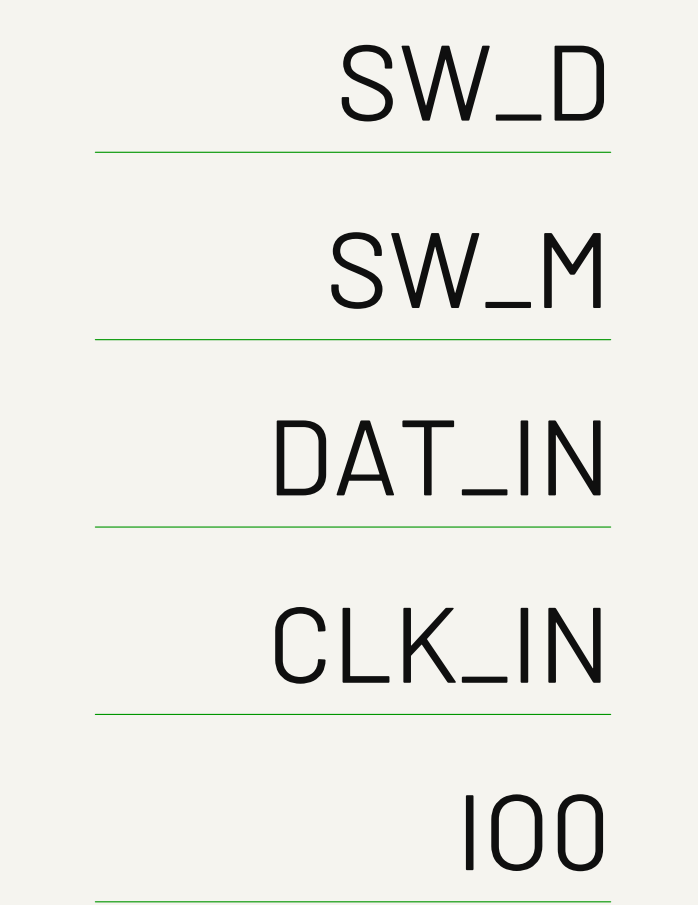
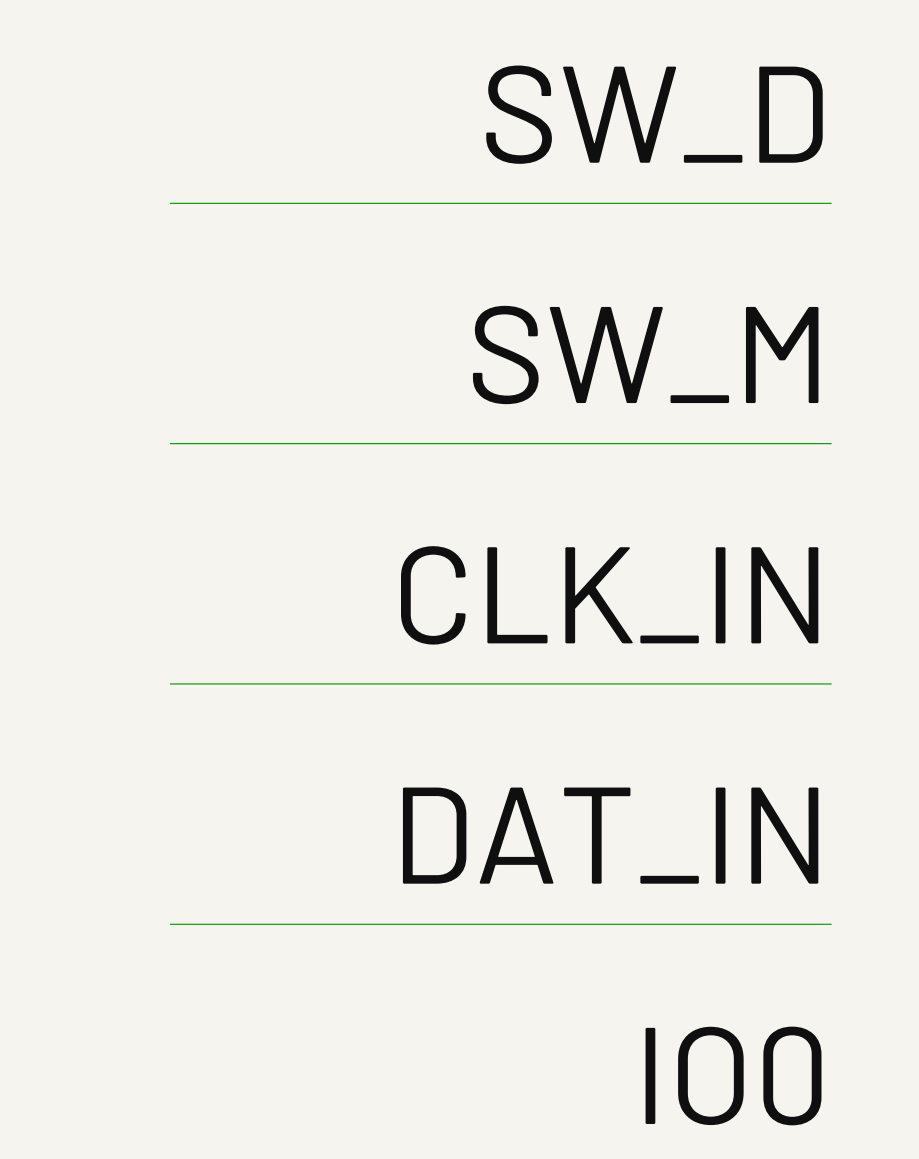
label: DAT_IN (438, 457) -> CLK_IN (609, 595)
label: CLK_IN (437, 645) -> DAT_IN (610, 835)

